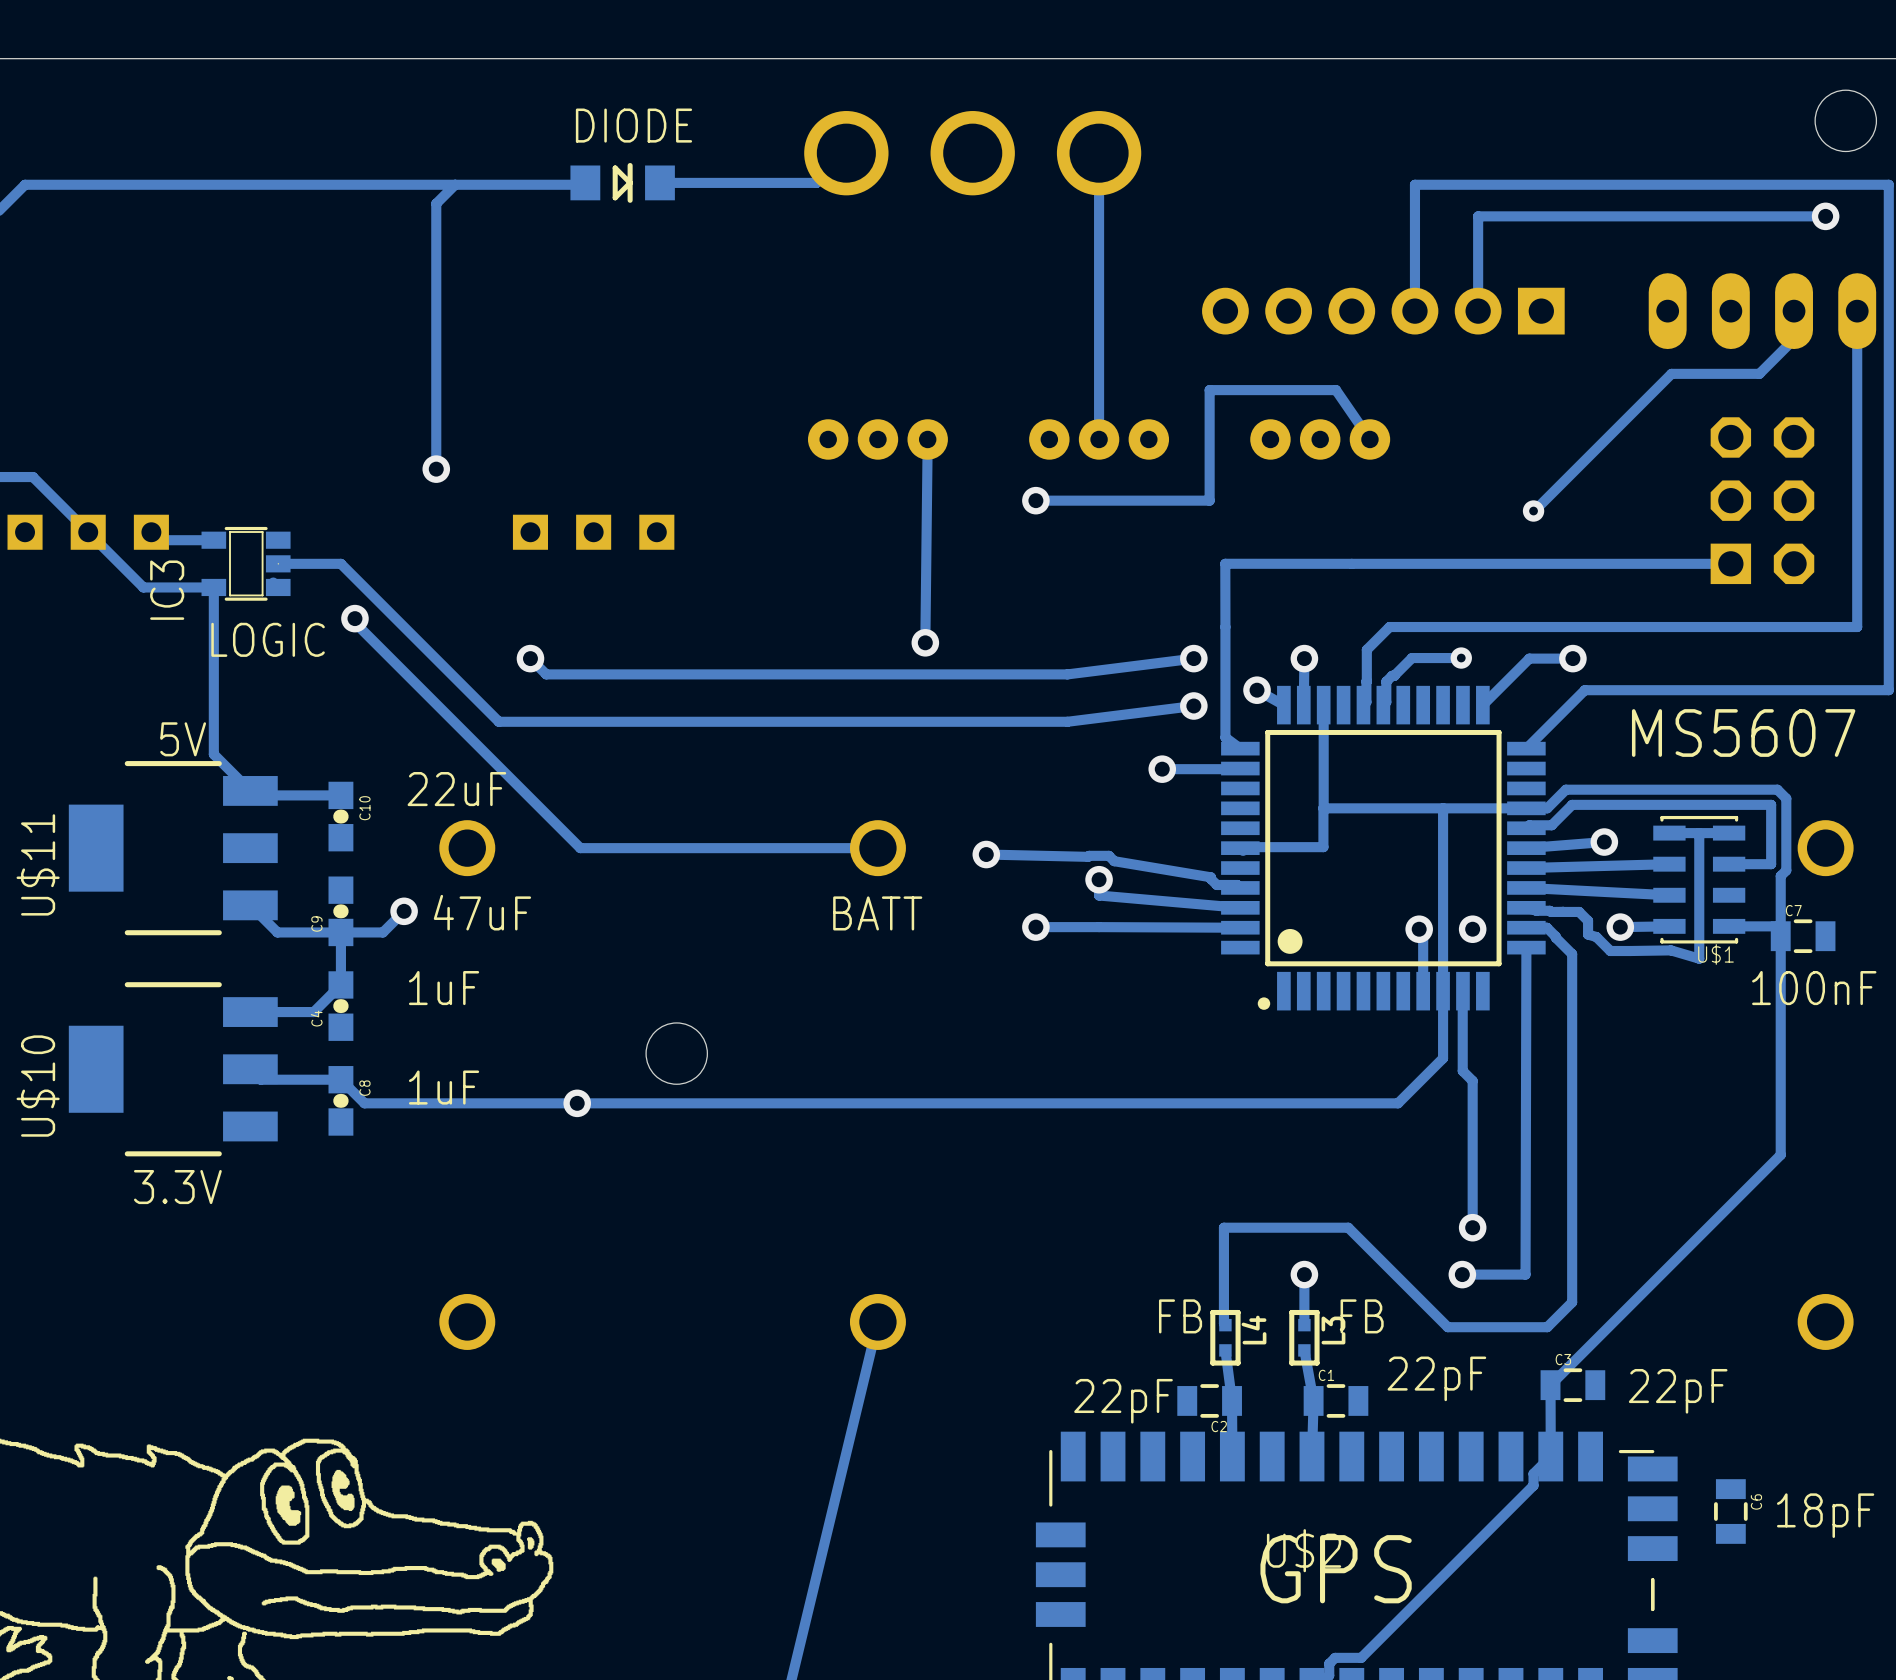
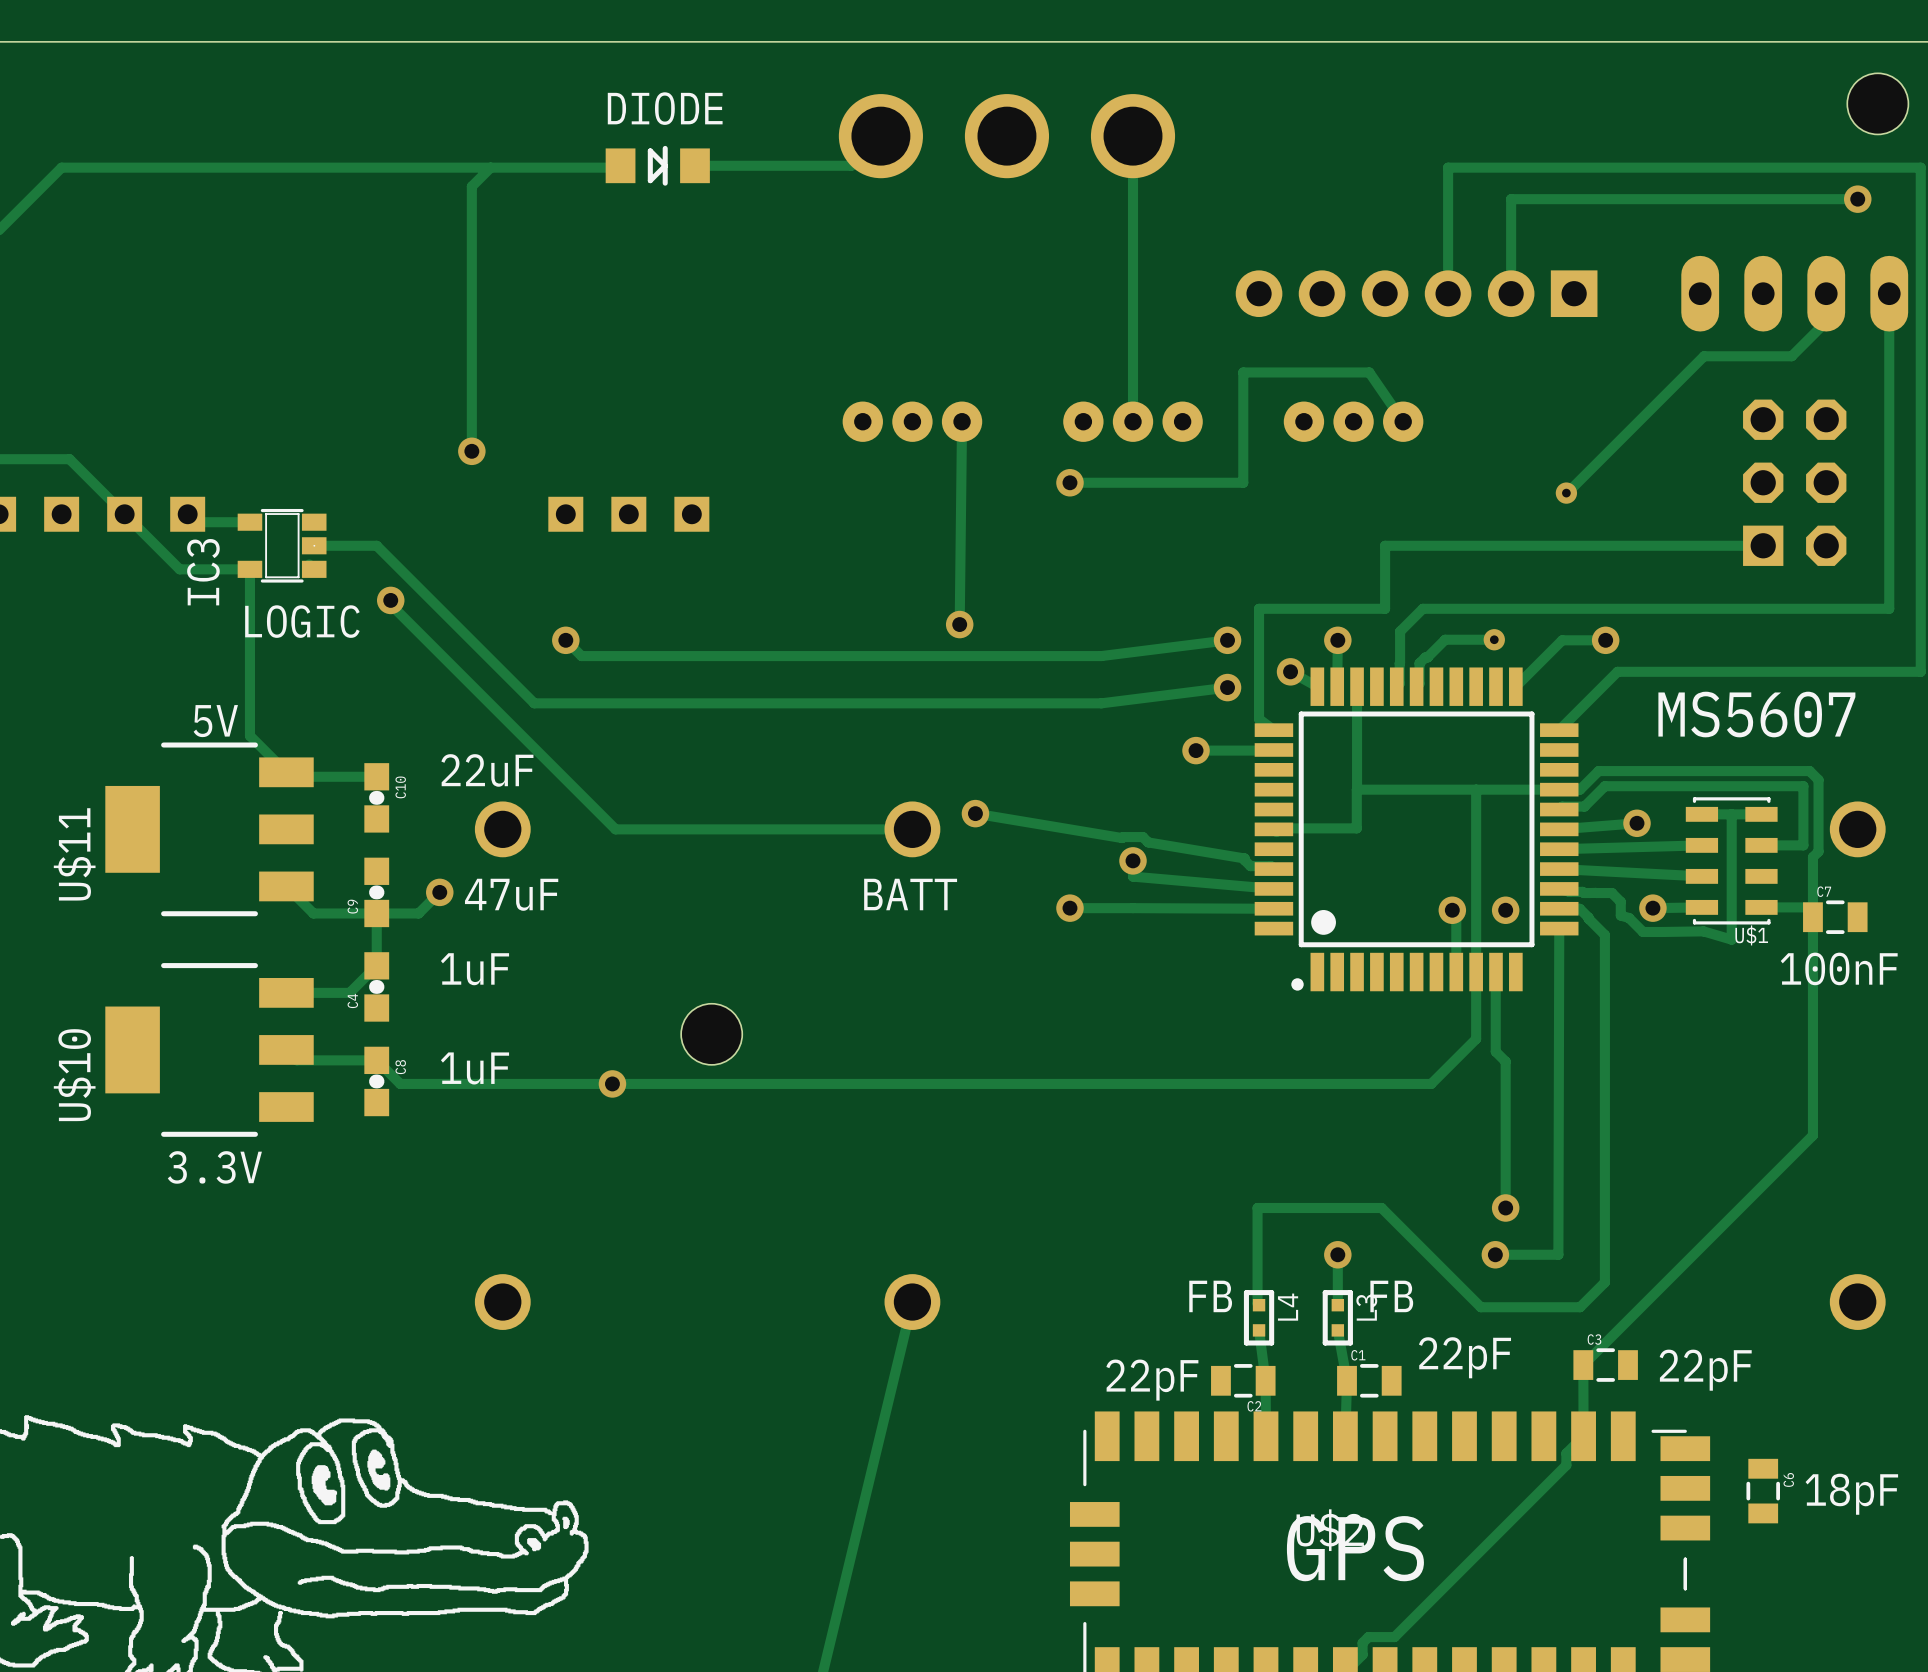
track: (1351, 563) (1225, 563) (1225, 627) -> (1385, 545) (1385, 608) (1259, 608)
track: (986, 854) (1088, 856) -> (975, 813) (1122, 838)
via position: (986, 854) -> (975, 813)

